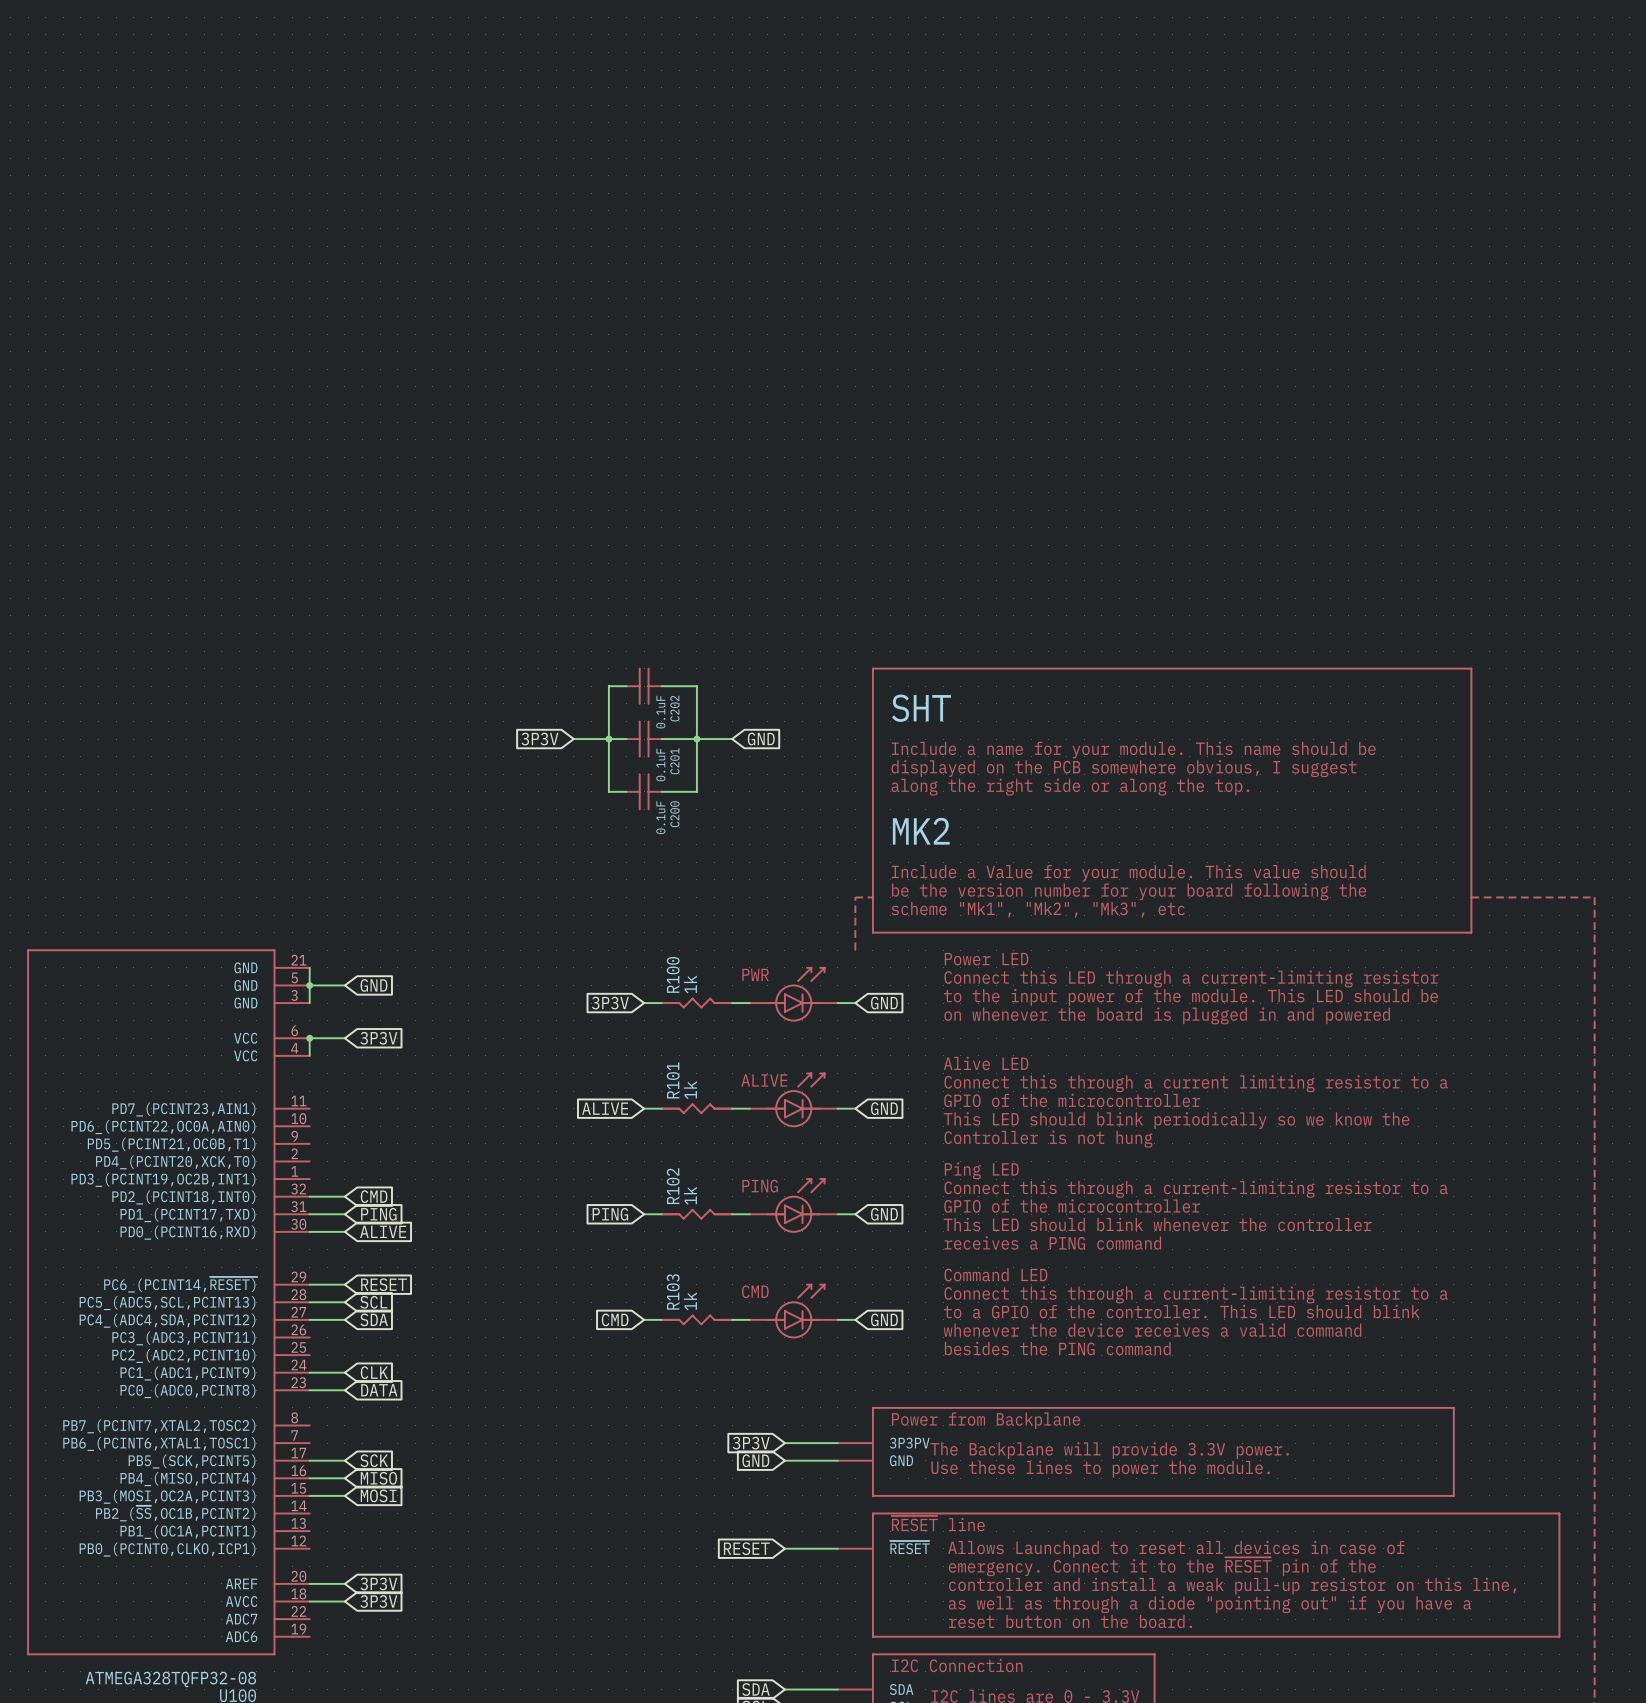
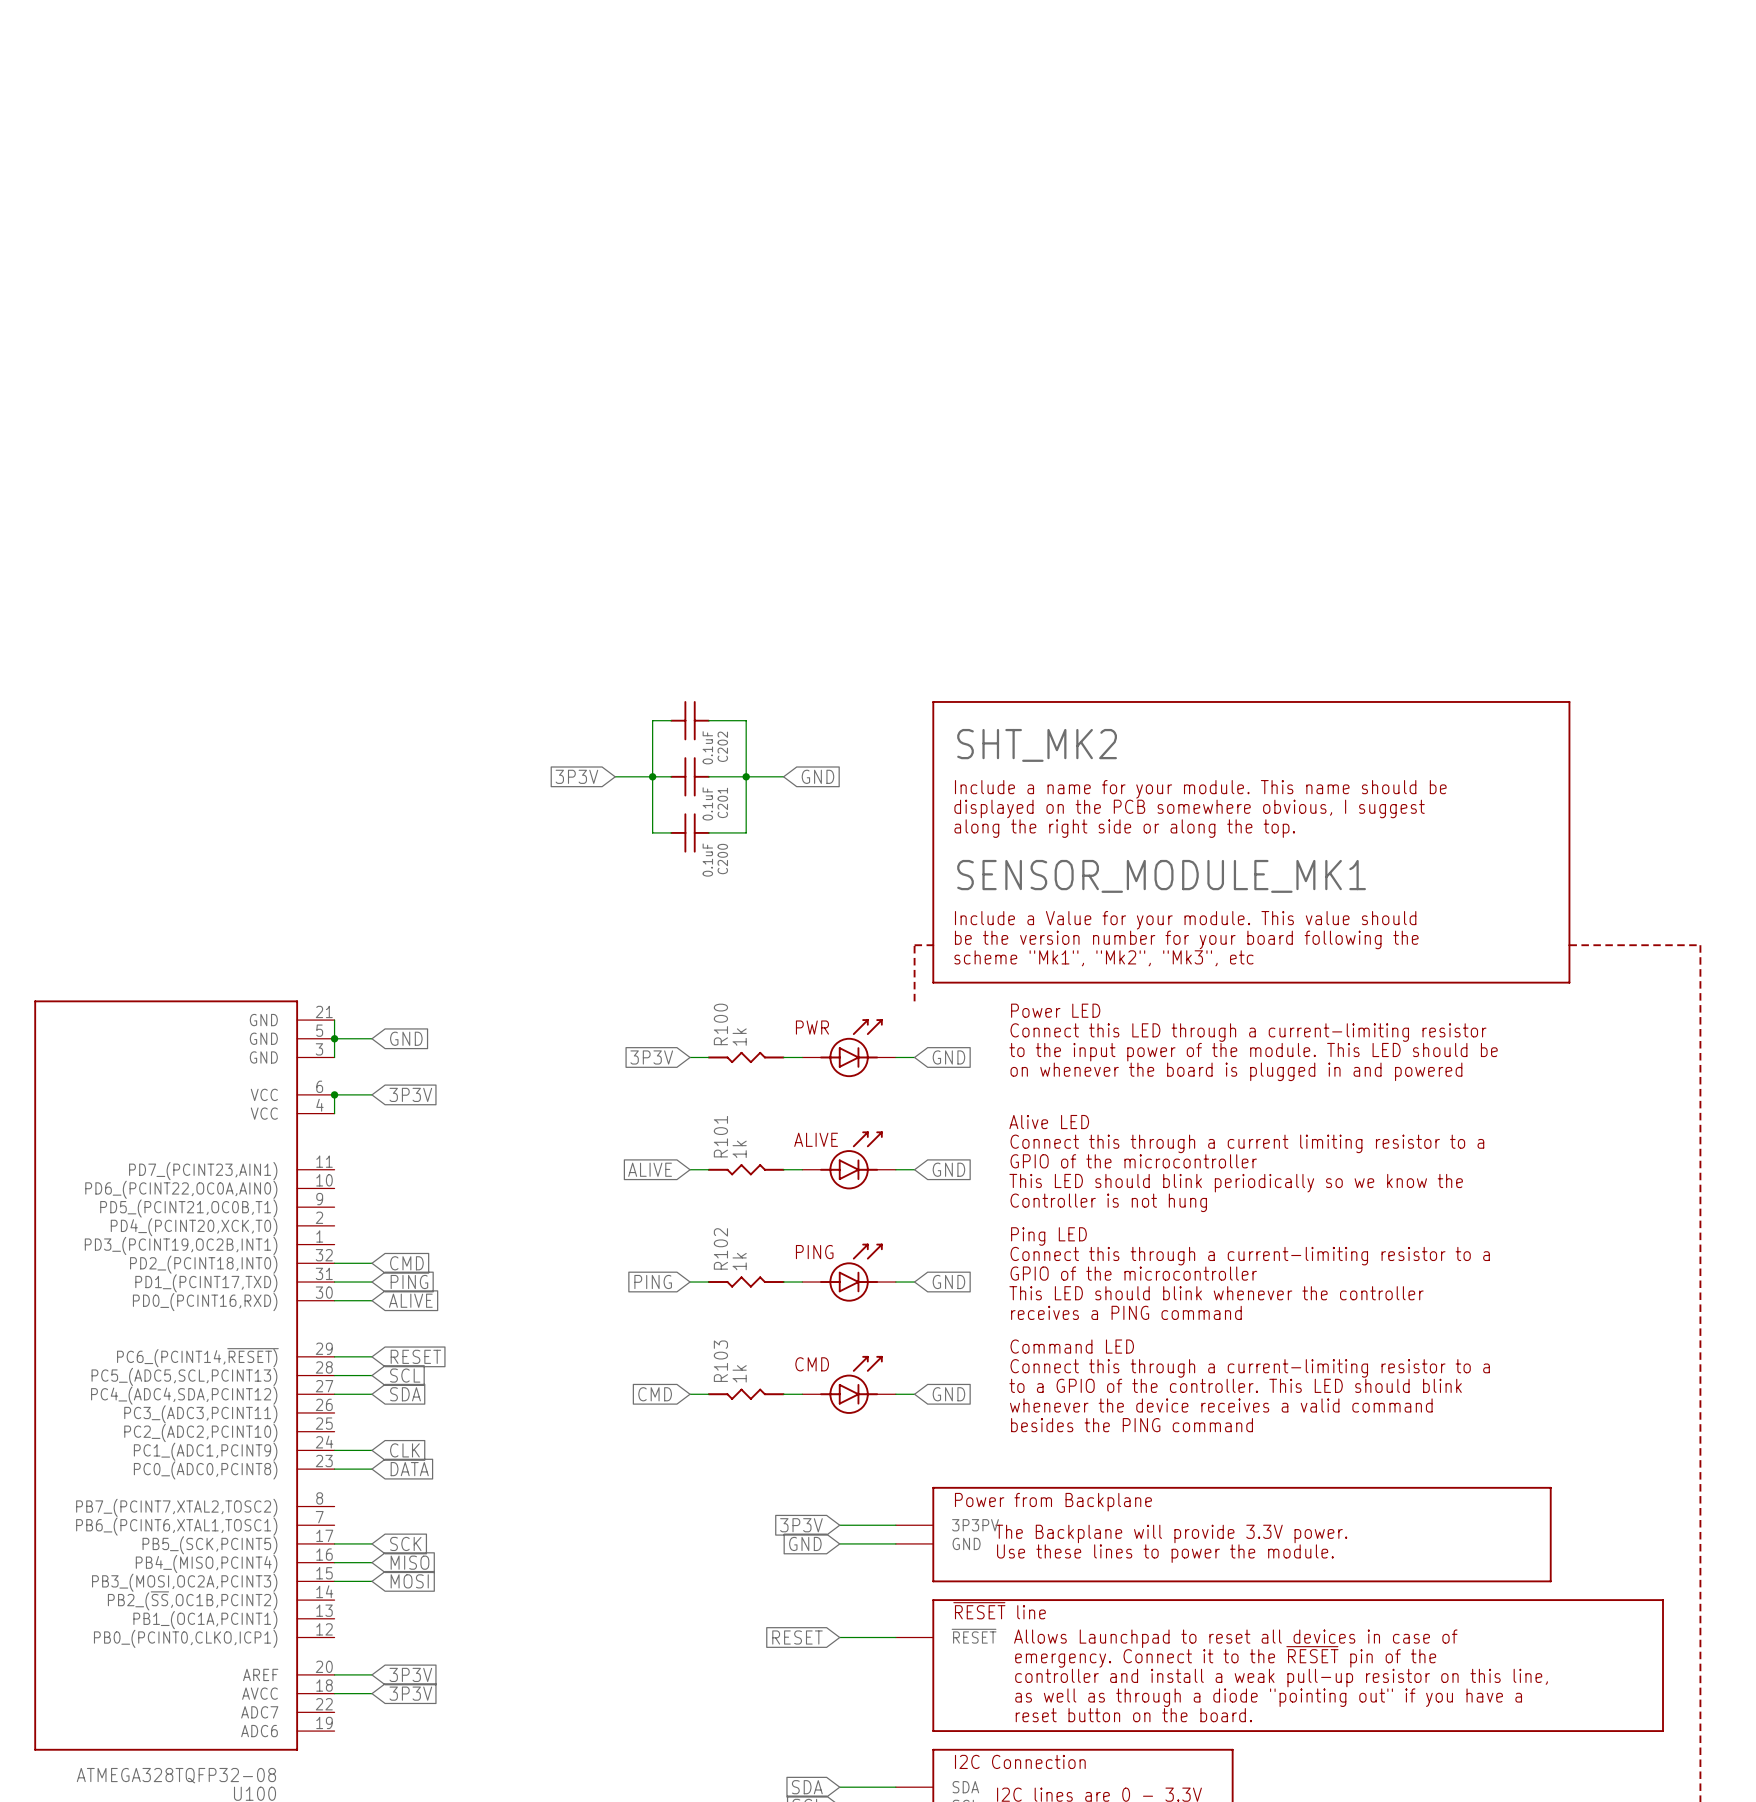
SHT name: SHT (921, 708) -> SHT_MK2 (1037, 745)
SHT value: MK2 (921, 831) -> SENSOR_MODULE_MK1 (1161, 876)

